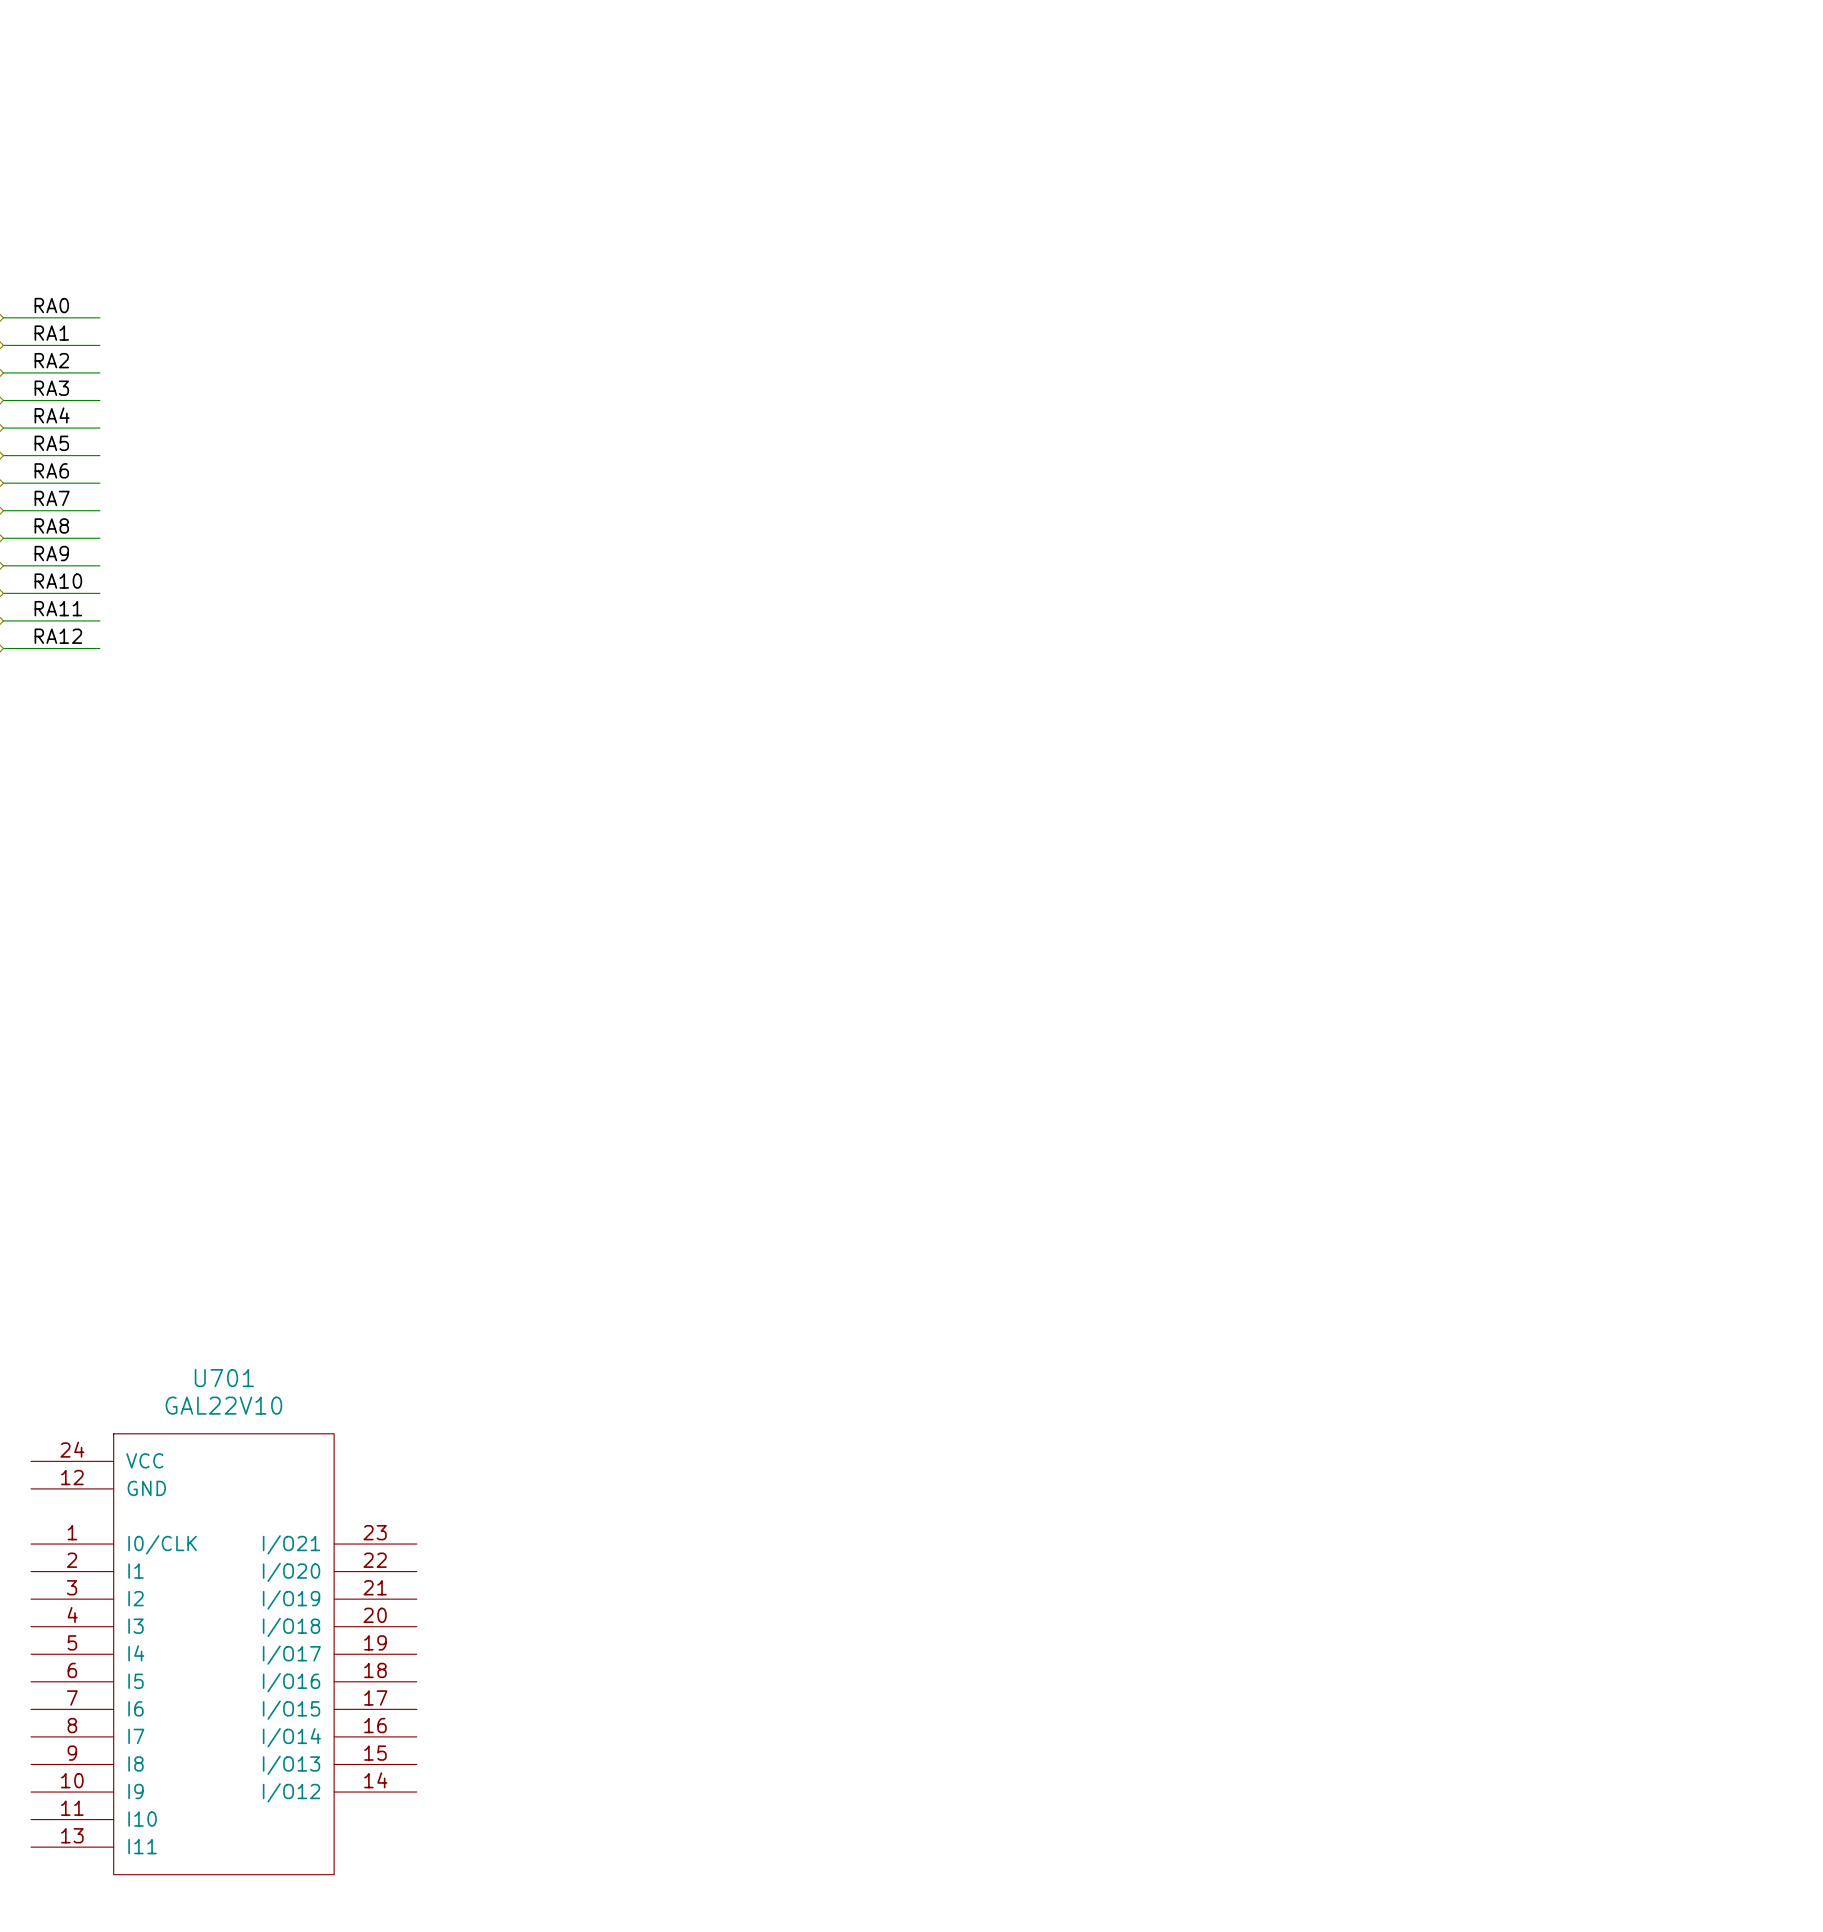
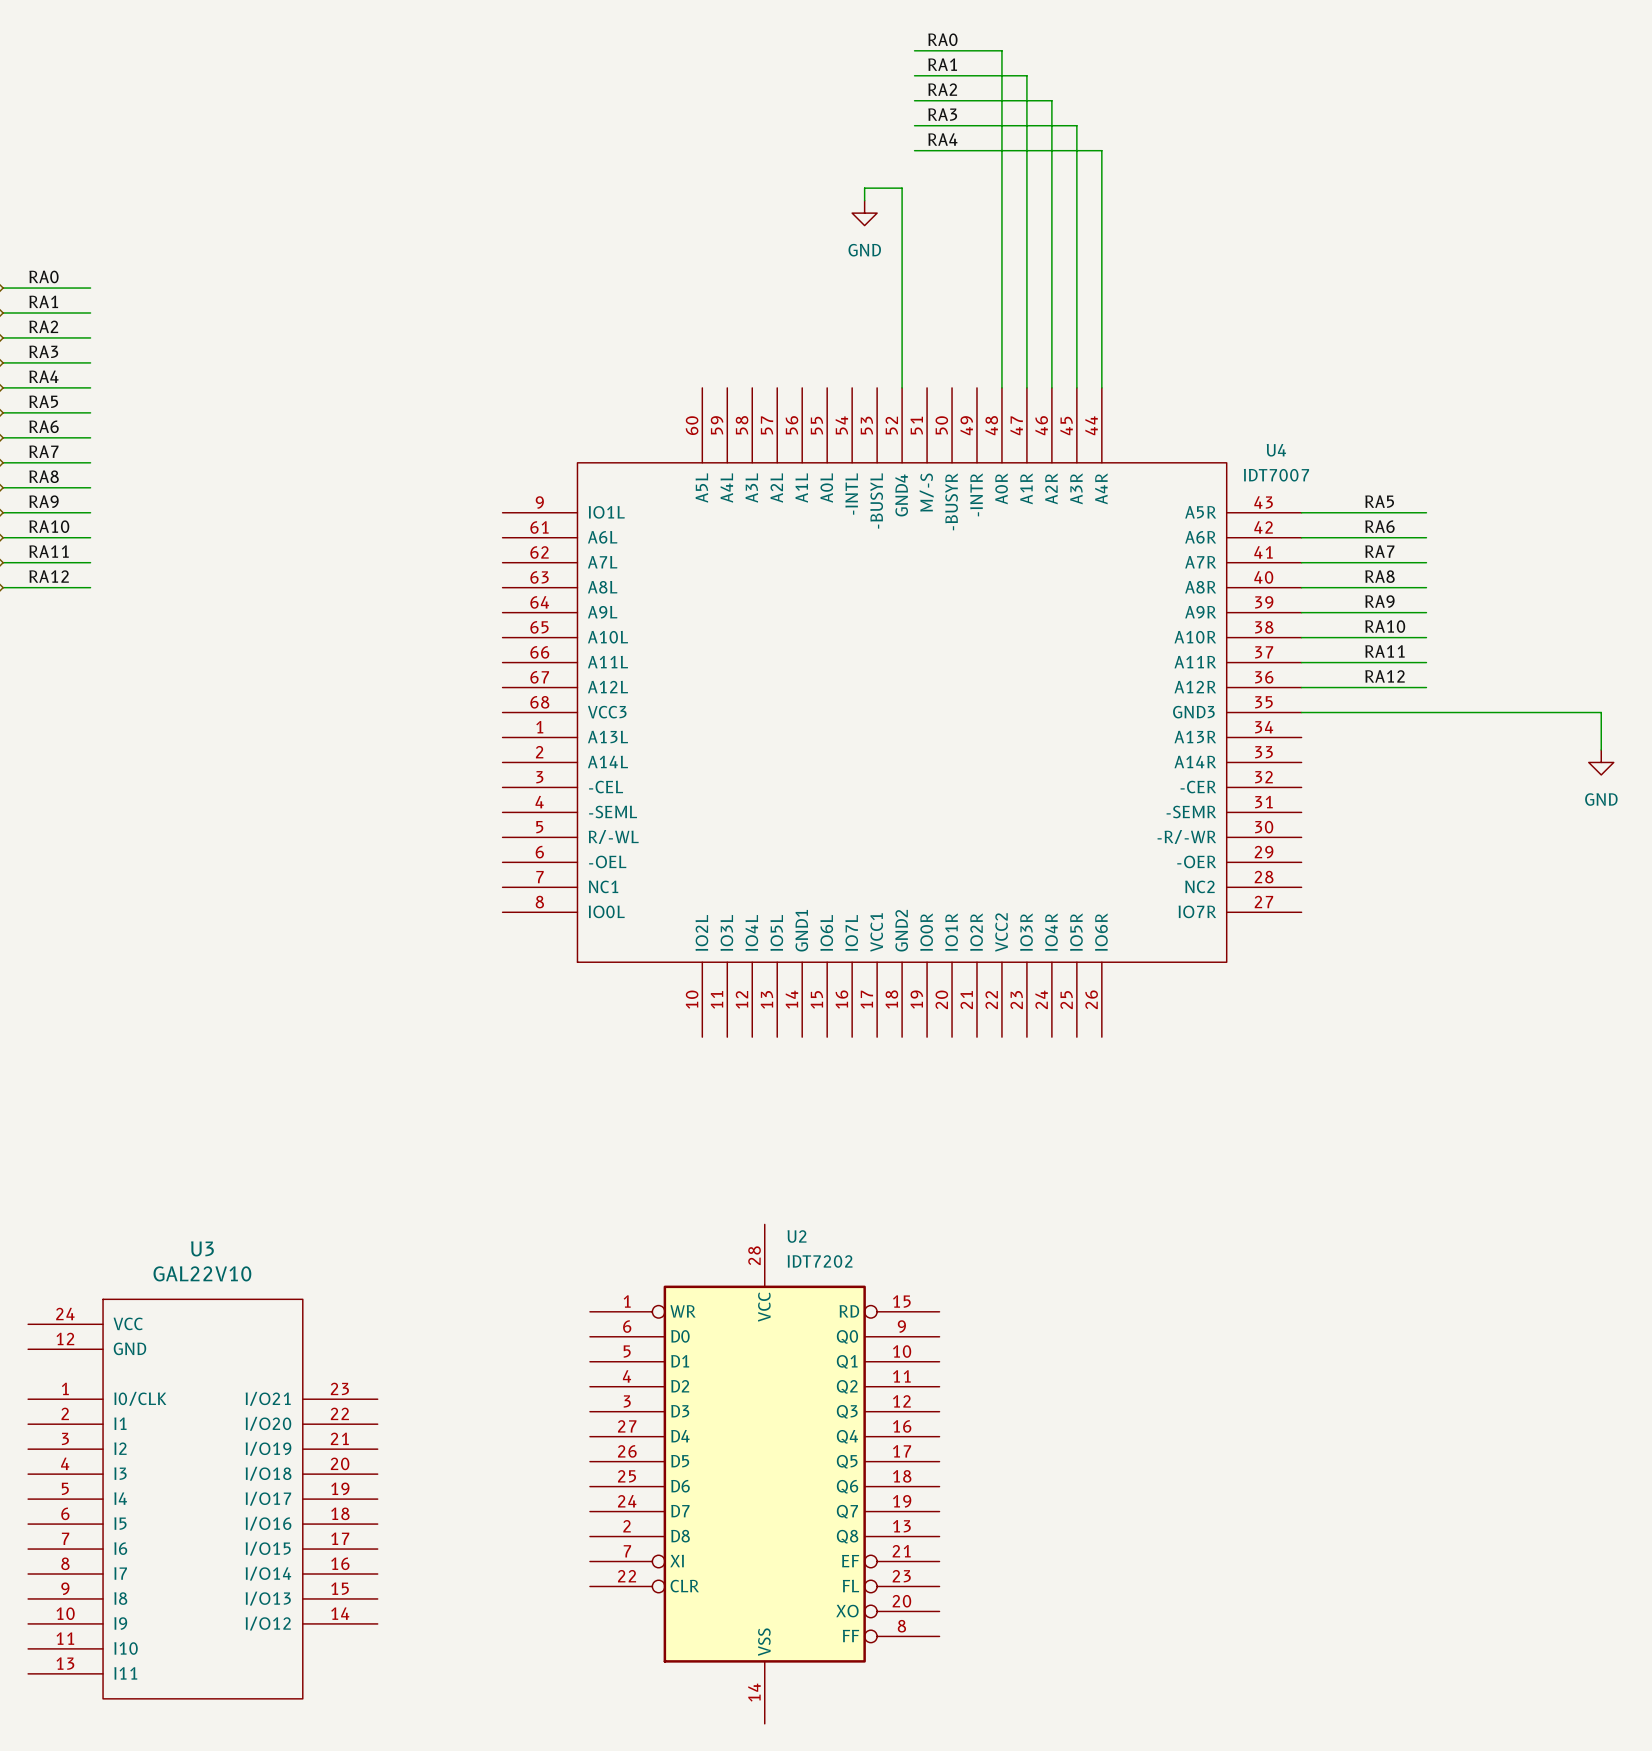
label: none -> RA0 (942, 39)
wire: none -> (914, 50) (1001, 50) (1001, 387)
label: none -> RA1 (942, 64)
wire: none -> (914, 75) (1026, 75) (1026, 387)
label: none -> RA2 (942, 89)
wire: none -> (914, 100) (1051, 100) (1051, 387)
label: none -> RA3 (942, 114)
wire: none -> (914, 125) (1076, 125) (1076, 387)
label: none -> RA4 (942, 139)
wire: none -> (914, 150) (1101, 150) (1101, 387)
wire: none -> (864, 200) (864, 188) (902, 188) (902, 387)
power symbol: none -> GND (864, 213)
label: none -> RA5 (1379, 501)
wire: none -> (1301, 512) (1426, 512)
label: none -> RA6 (1379, 526)
wire: none -> (1301, 537) (1426, 537)
label: none -> RA7 (1379, 551)
wire: none -> (1301, 562) (1426, 562)
label: none -> RA8 (1379, 576)
wire: none -> (1301, 587) (1426, 587)
label: none -> RA9 (1379, 601)
wire: none -> (1301, 612) (1426, 612)
label: none -> RA10 (1385, 626)
wire: none -> (1301, 637) (1426, 637)
label: none -> RA11 (1385, 651)
wire: none -> (1301, 662) (1426, 662)
label: none -> RA12 (1385, 676)
wire: none -> (1301, 687) (1426, 687)
U4: none -> IDT7007 (902, 712)
wire: none -> (1301, 712) (1601, 712) (1601, 749)
power symbol: none -> GND (1601, 762)
U701 name: U701 (224, 1378) -> U3 (202, 1248)
U2: none -> IDT7202 (764, 1474)

